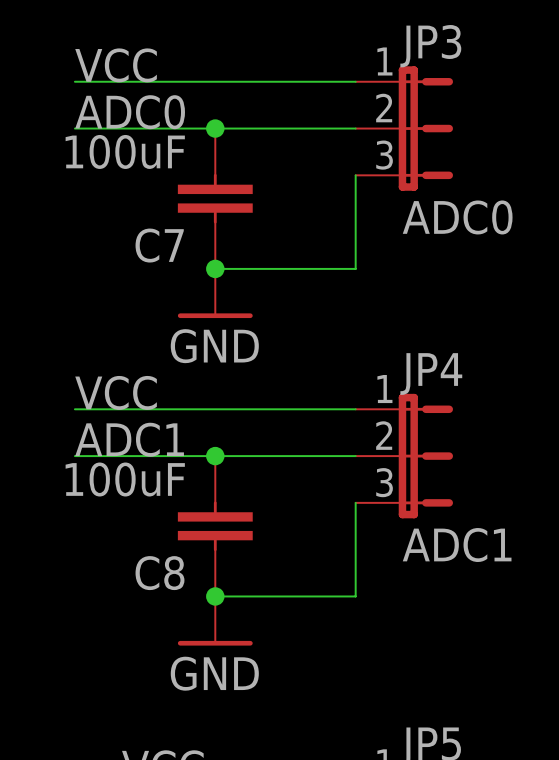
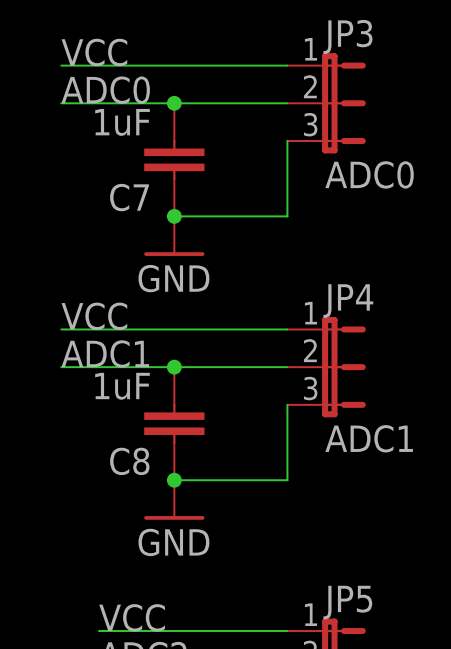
C7 value: 100uF (125, 151) -> 1uF (122, 122)
C8 value: 100uF (125, 479) -> 1uF (122, 386)

